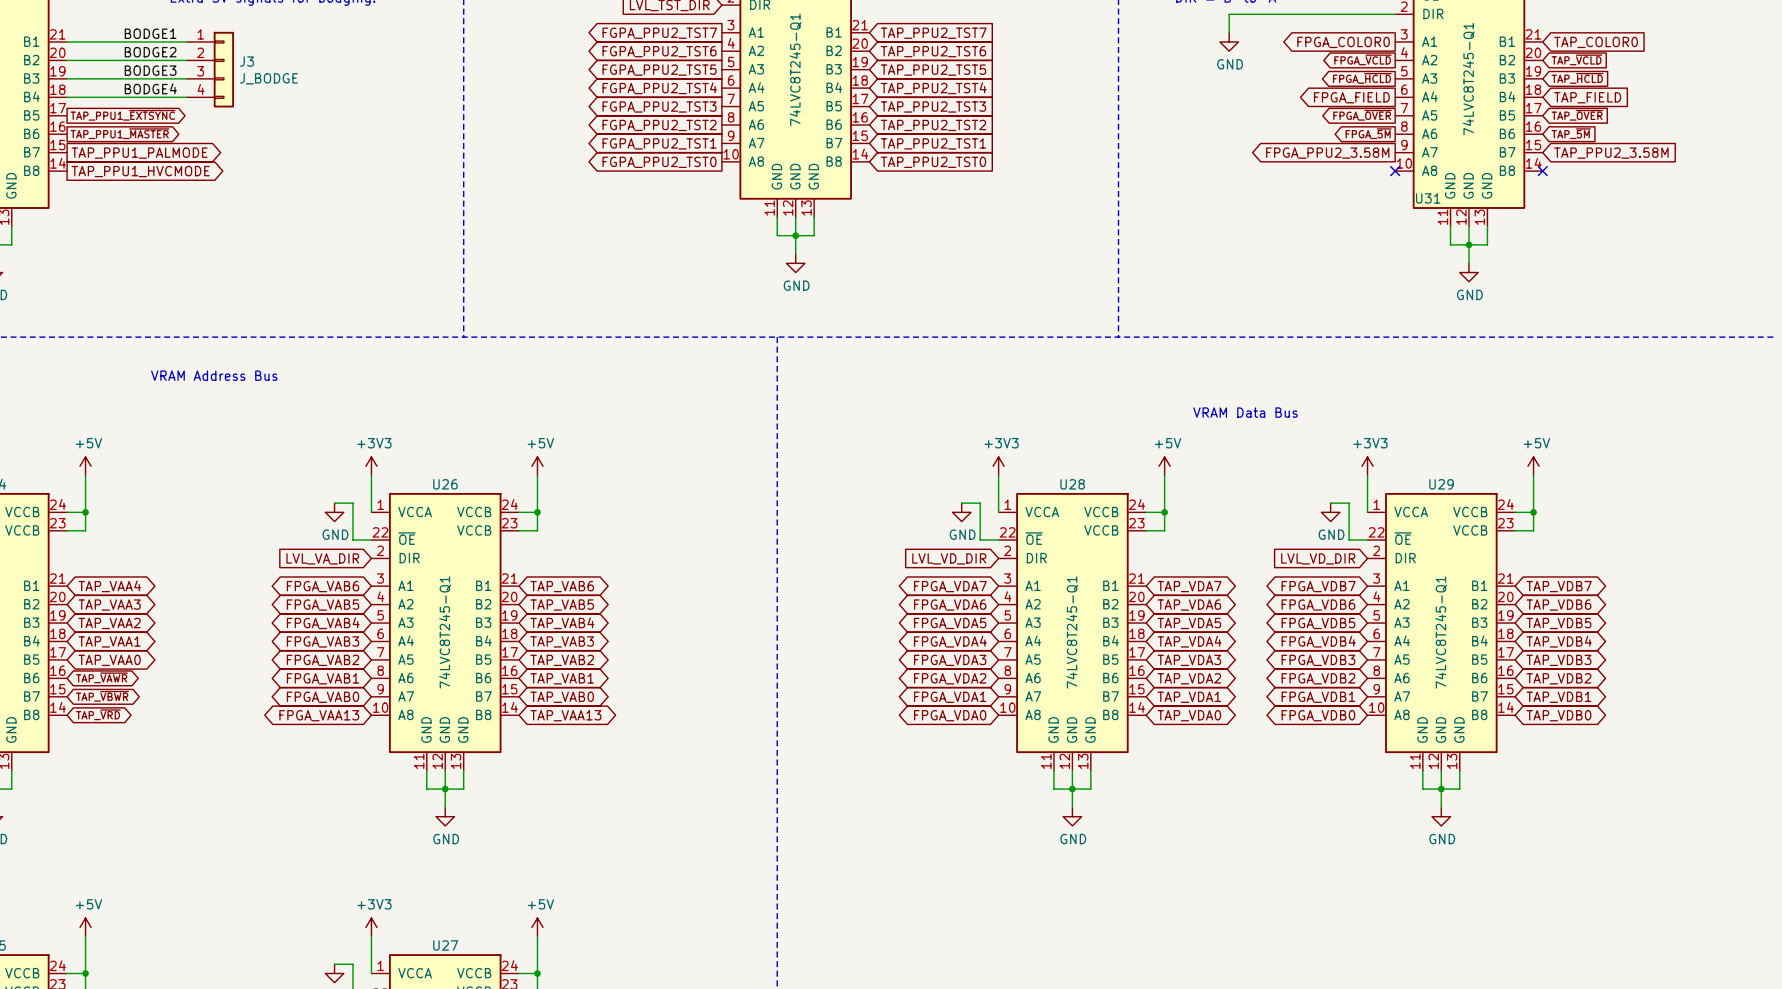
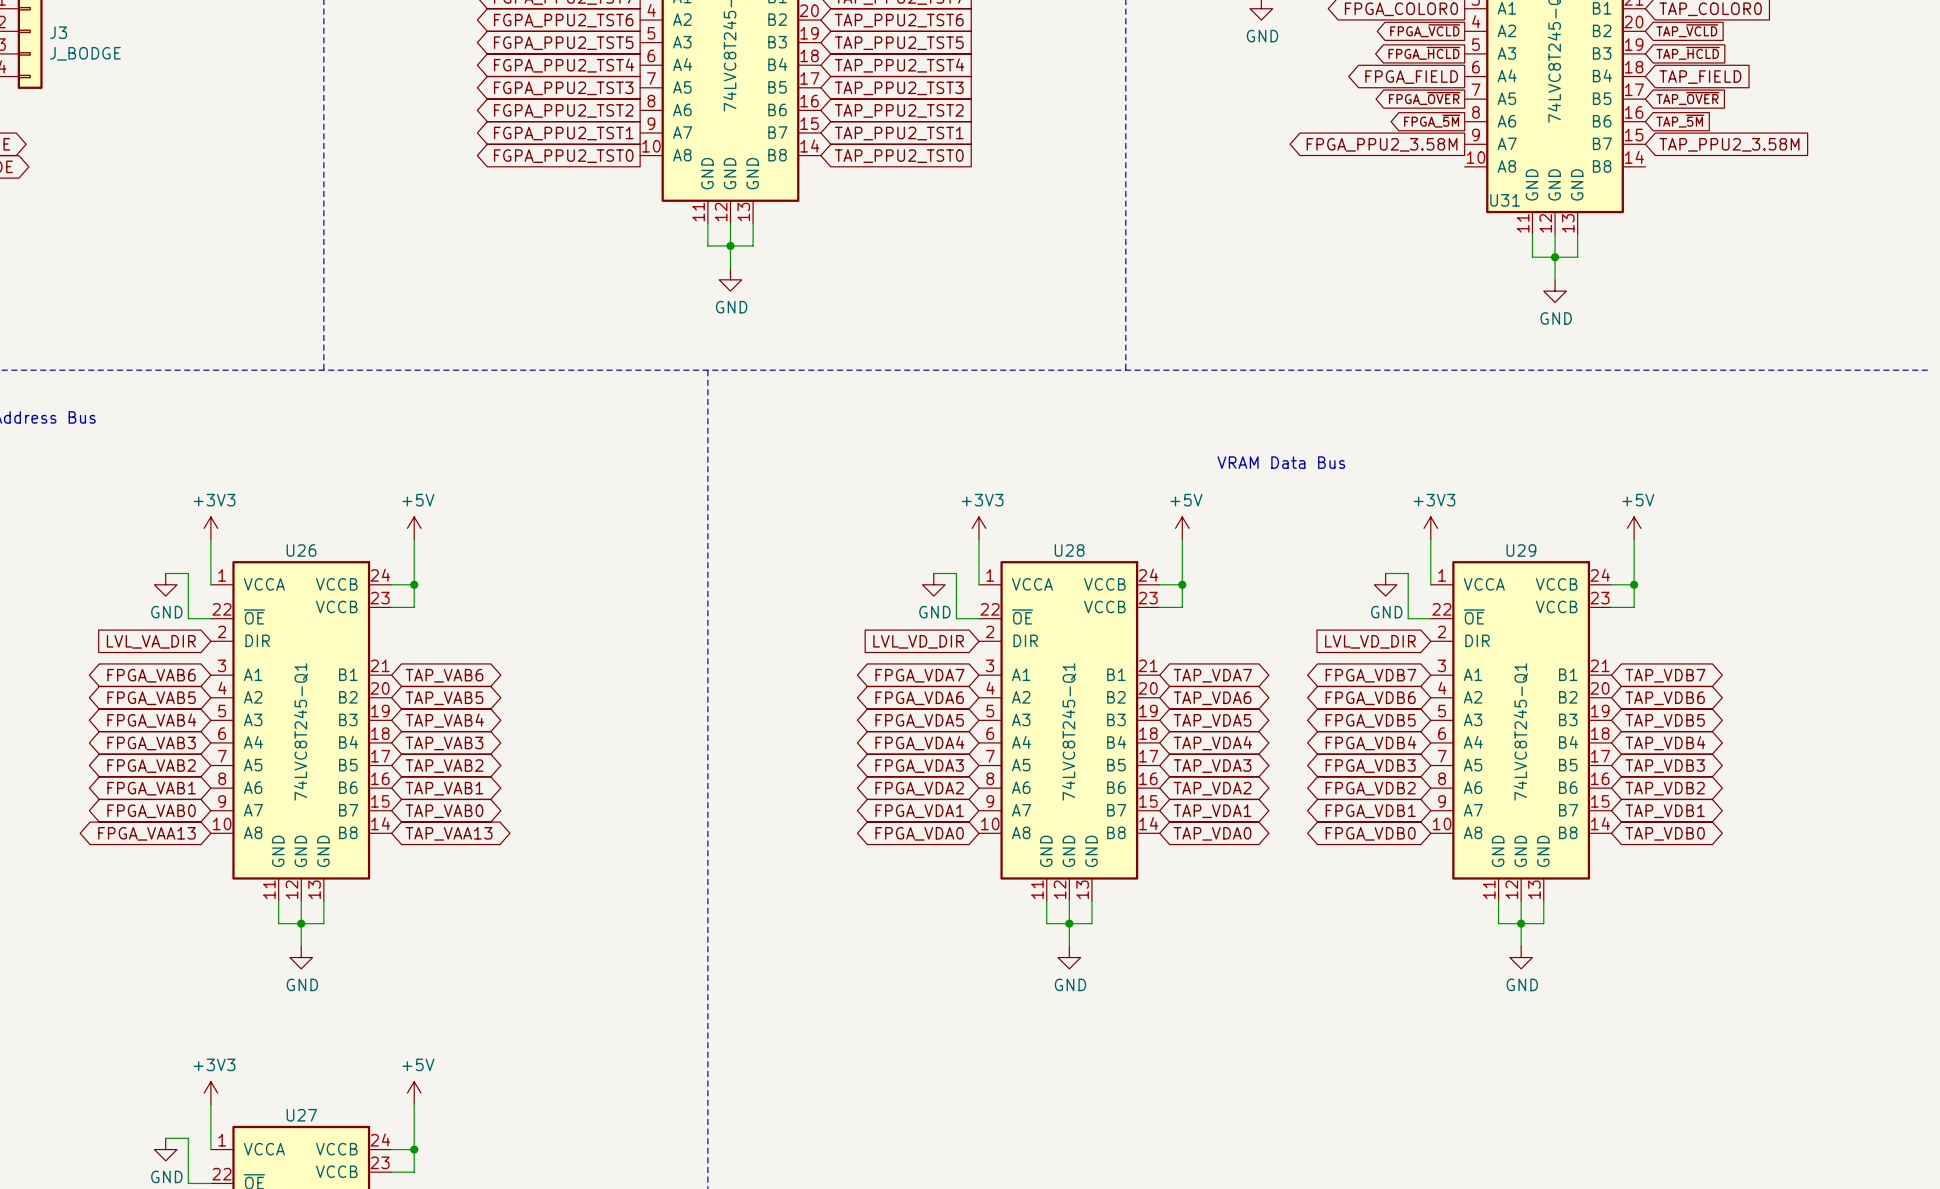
no-connect mark: (1395, 171) -> none
no-connect mark: (1542, 171) -> none

